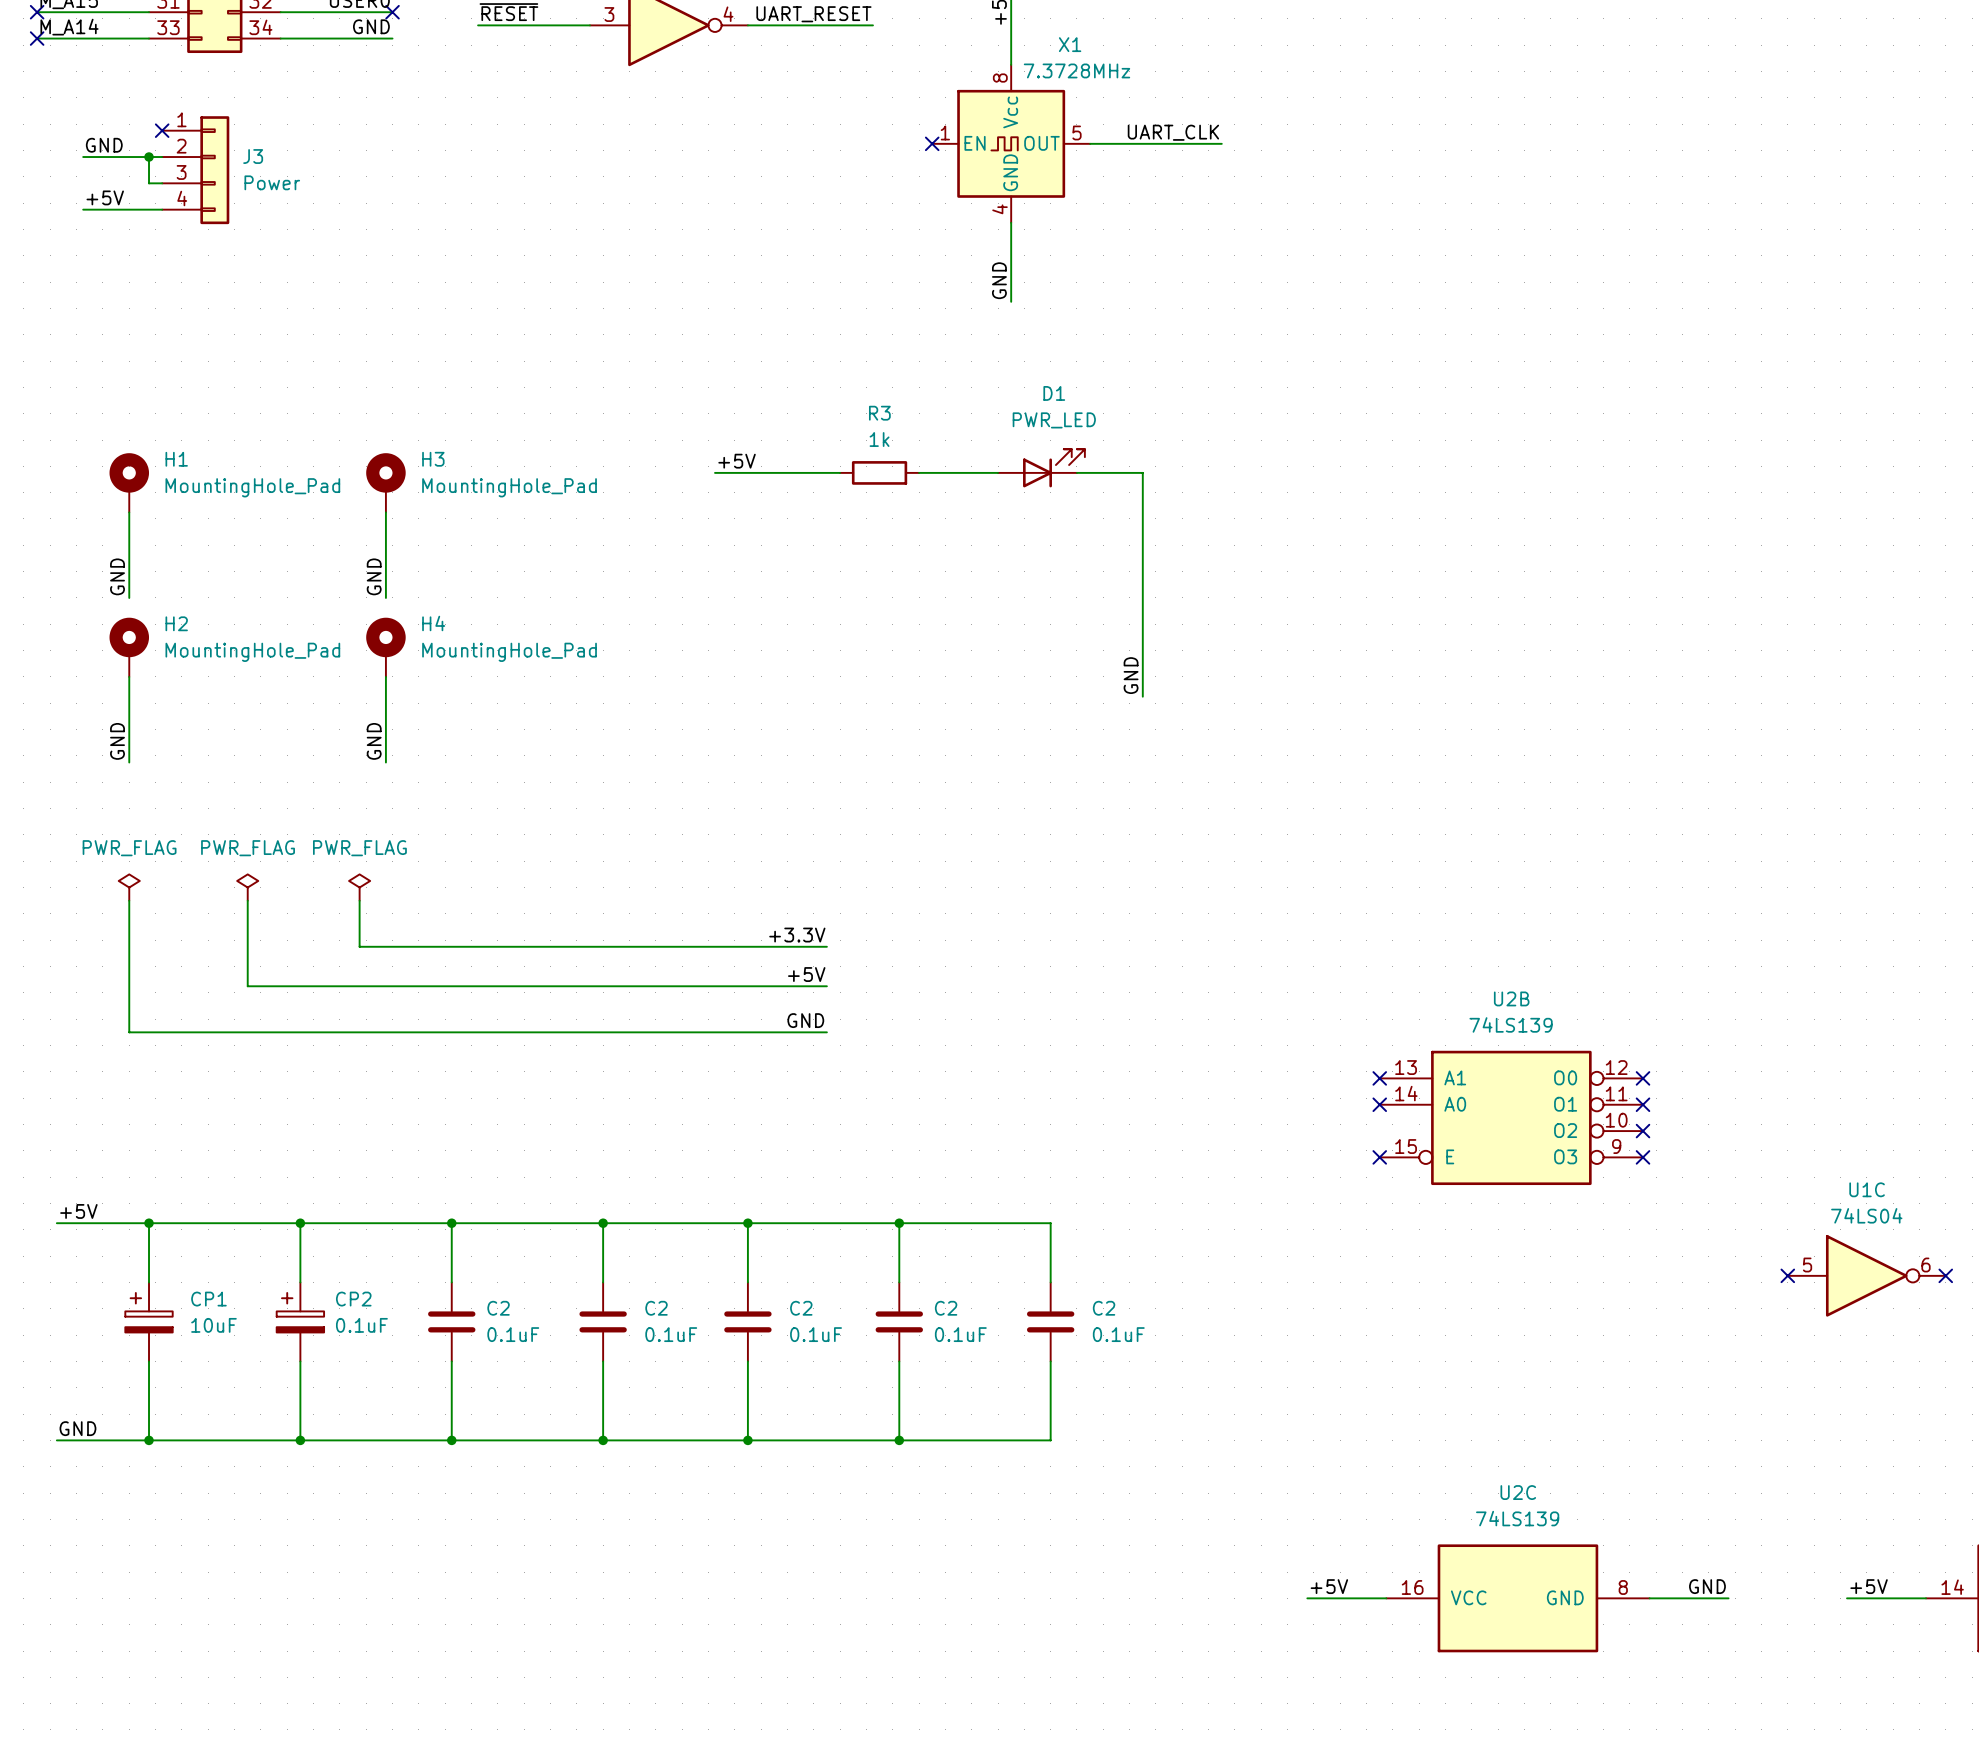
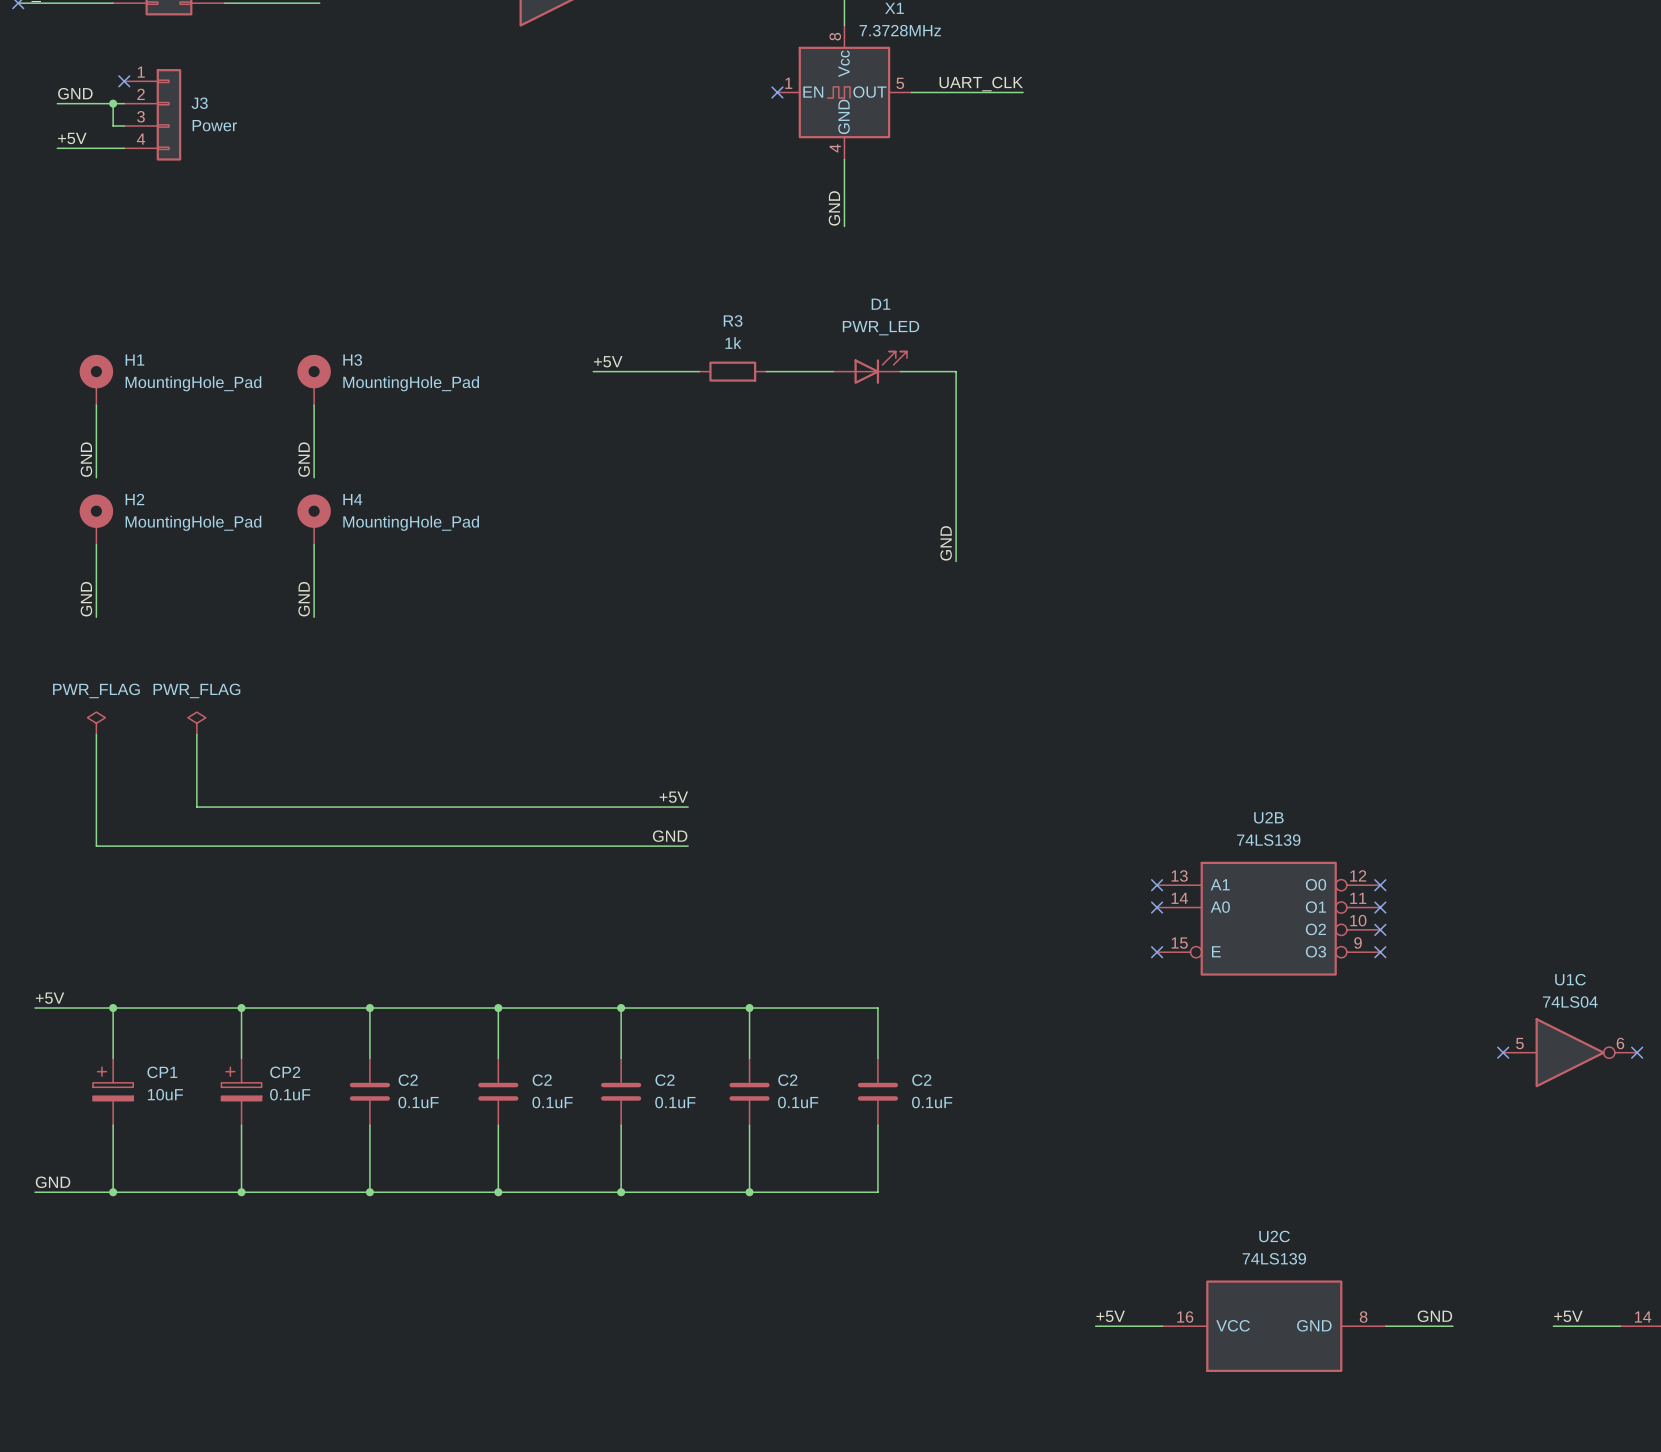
power symbol: PWR_FLAG (359, 887) -> none
wire: (359, 900) (359, 946) (826, 946) -> none
label: +3.3V (797, 935) -> none

